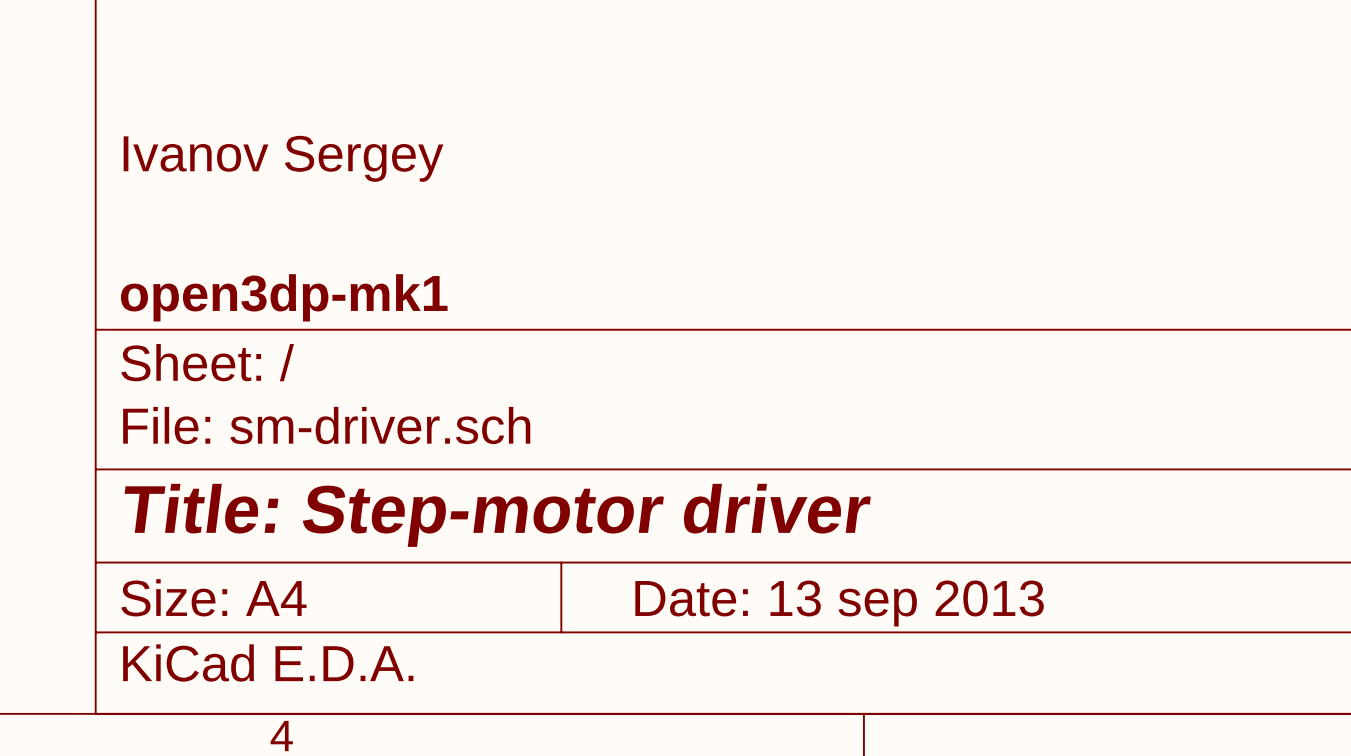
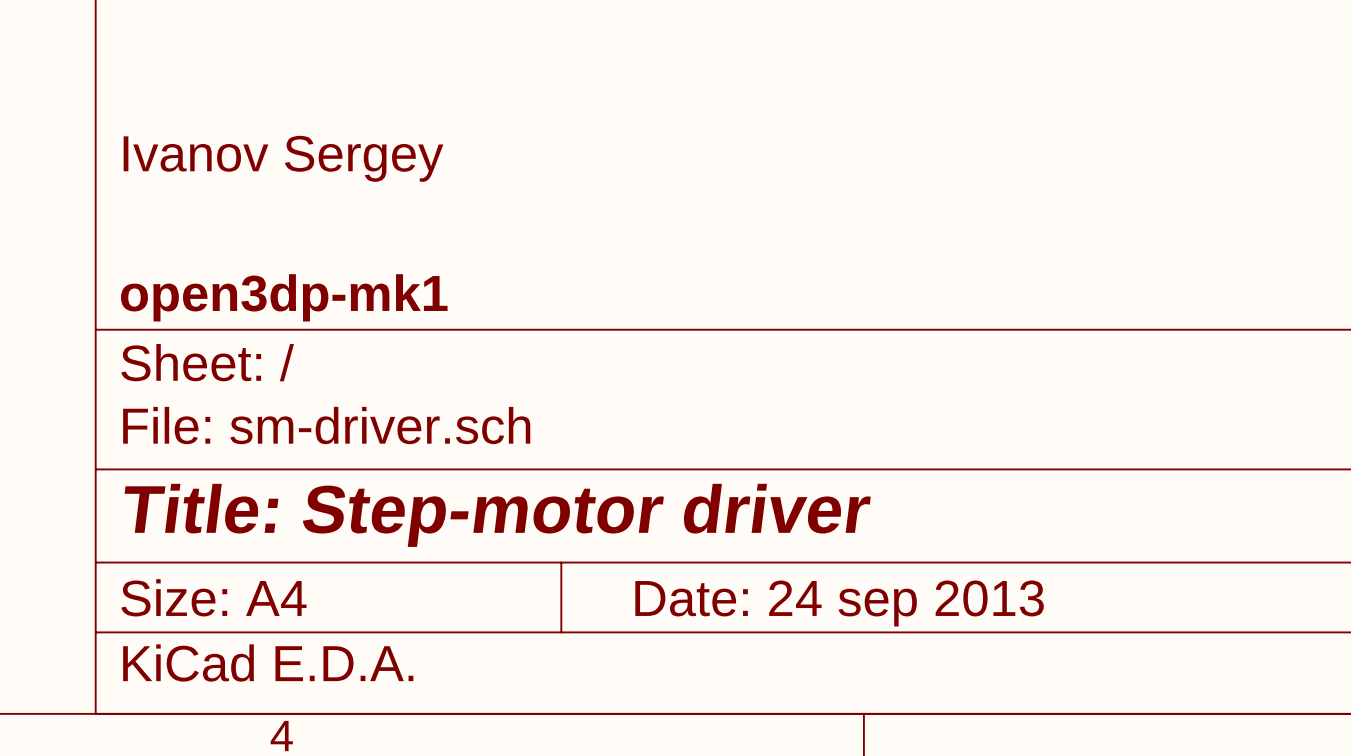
title block: Date: 13 sep 2013 (839, 603) -> Date: 24 sep 2013 (839, 603)

